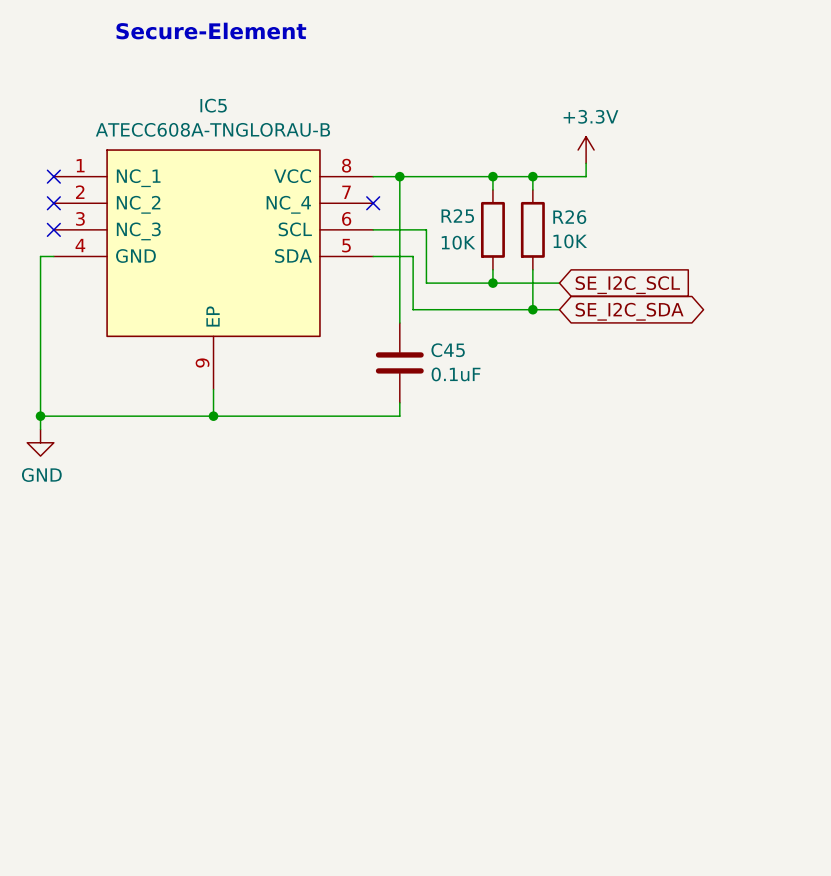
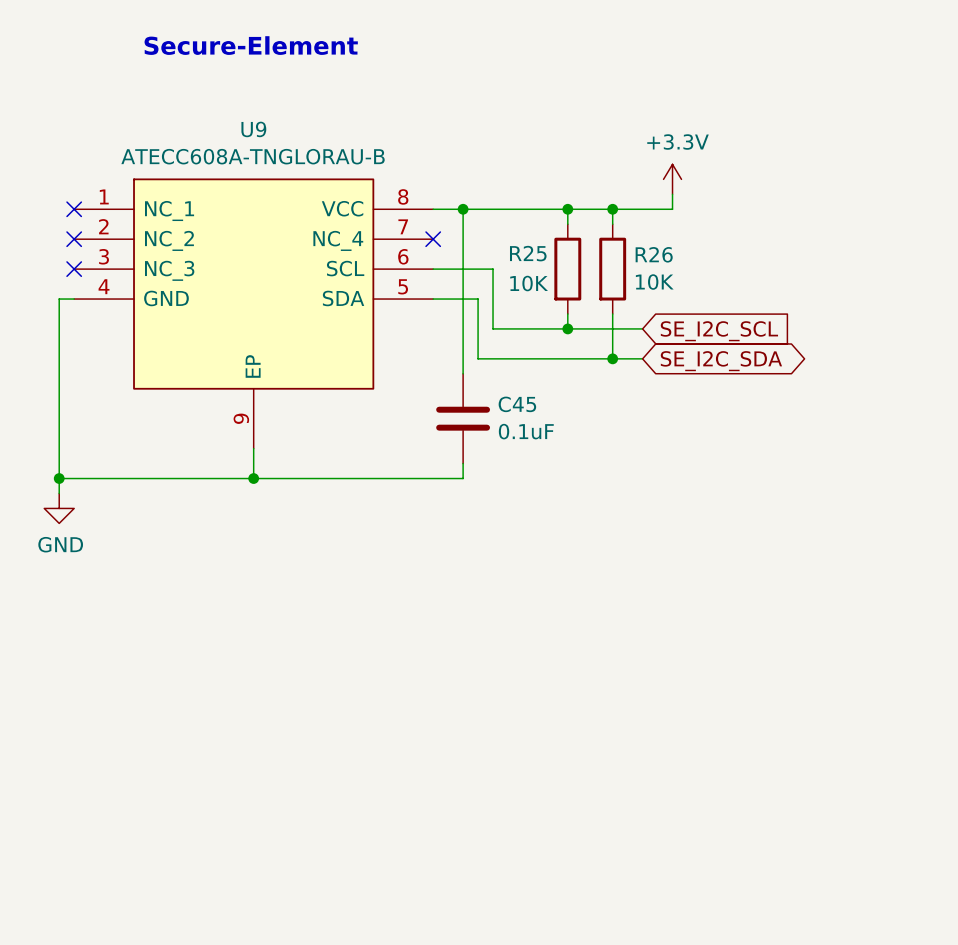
IC5 name: IC5 (213, 105) -> U9 (253, 129)

